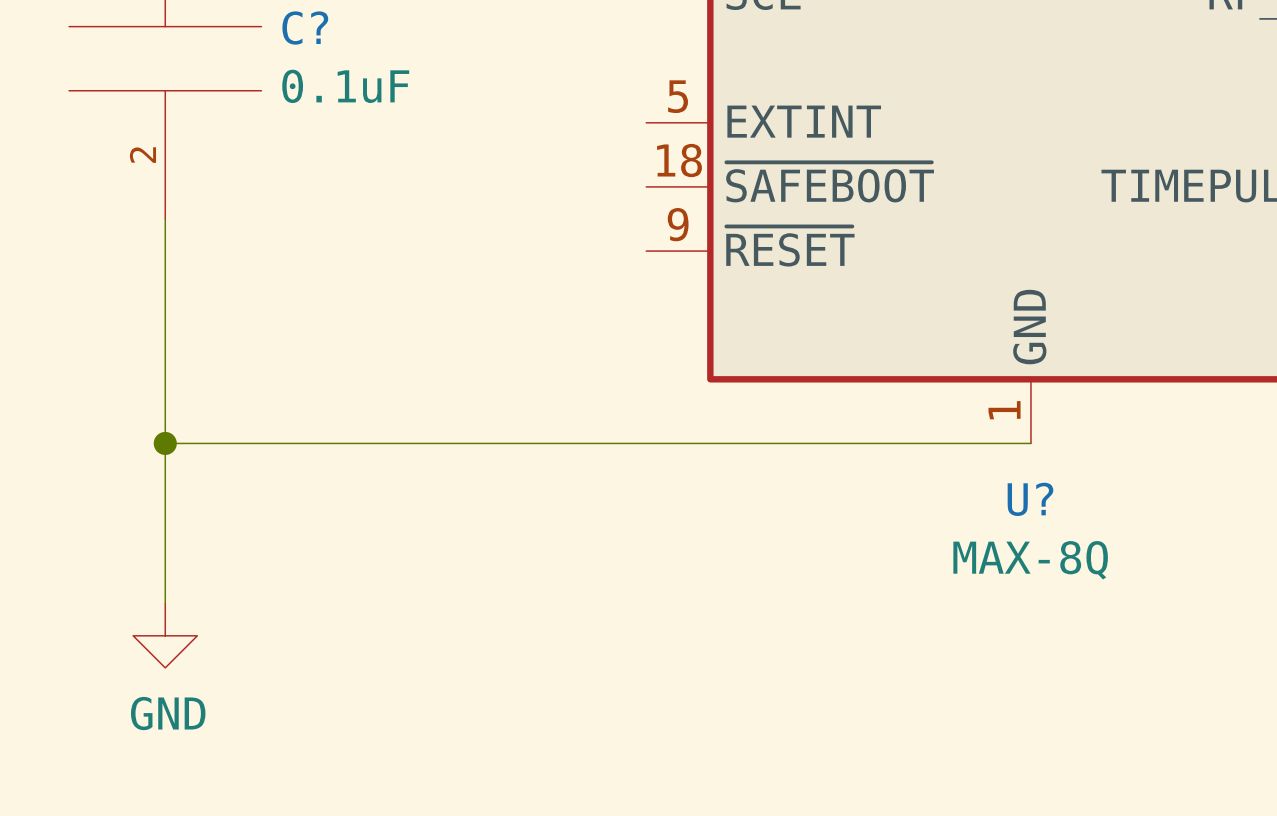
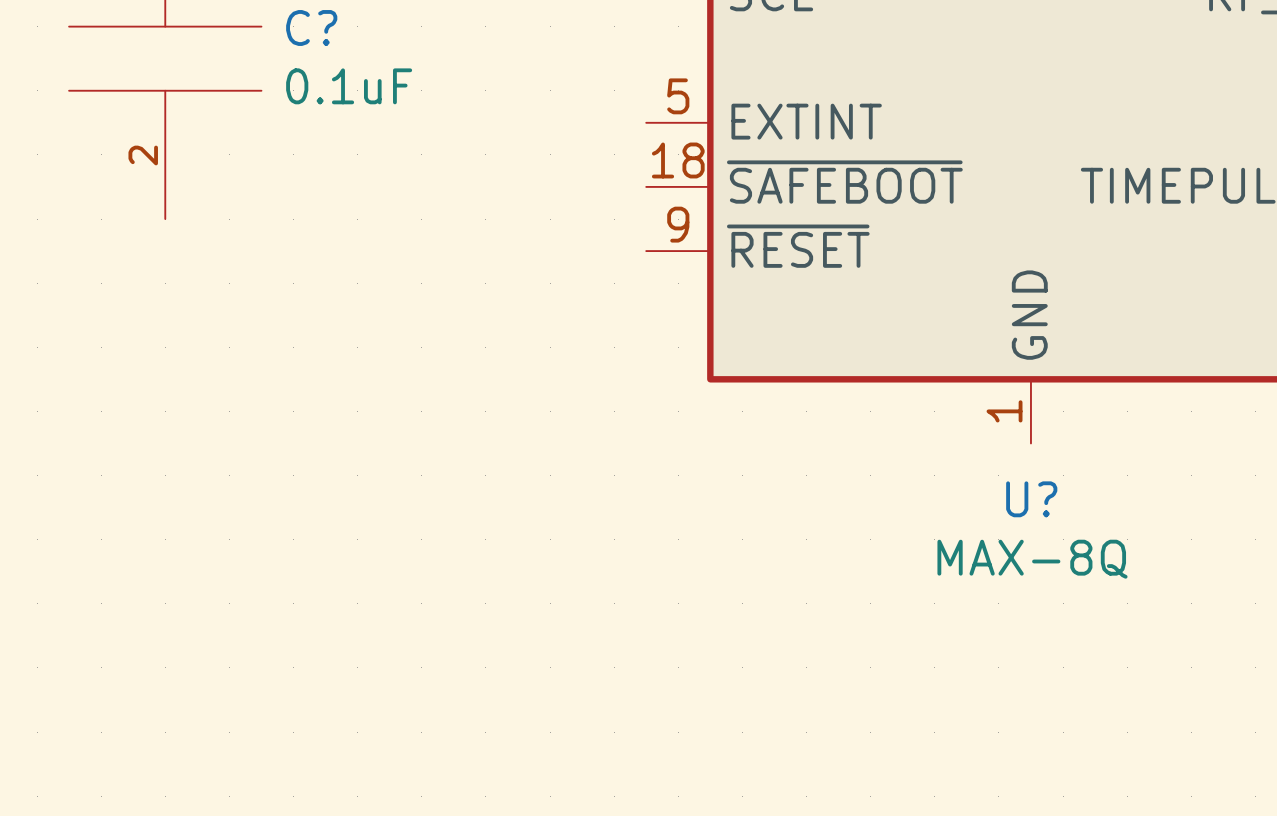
wire: (165, 219) (165, 603) -> none
wire: (165, 443) (1030, 443) -> none
junction: (165, 443) -> none
power symbol: GND (165, 635) -> none

